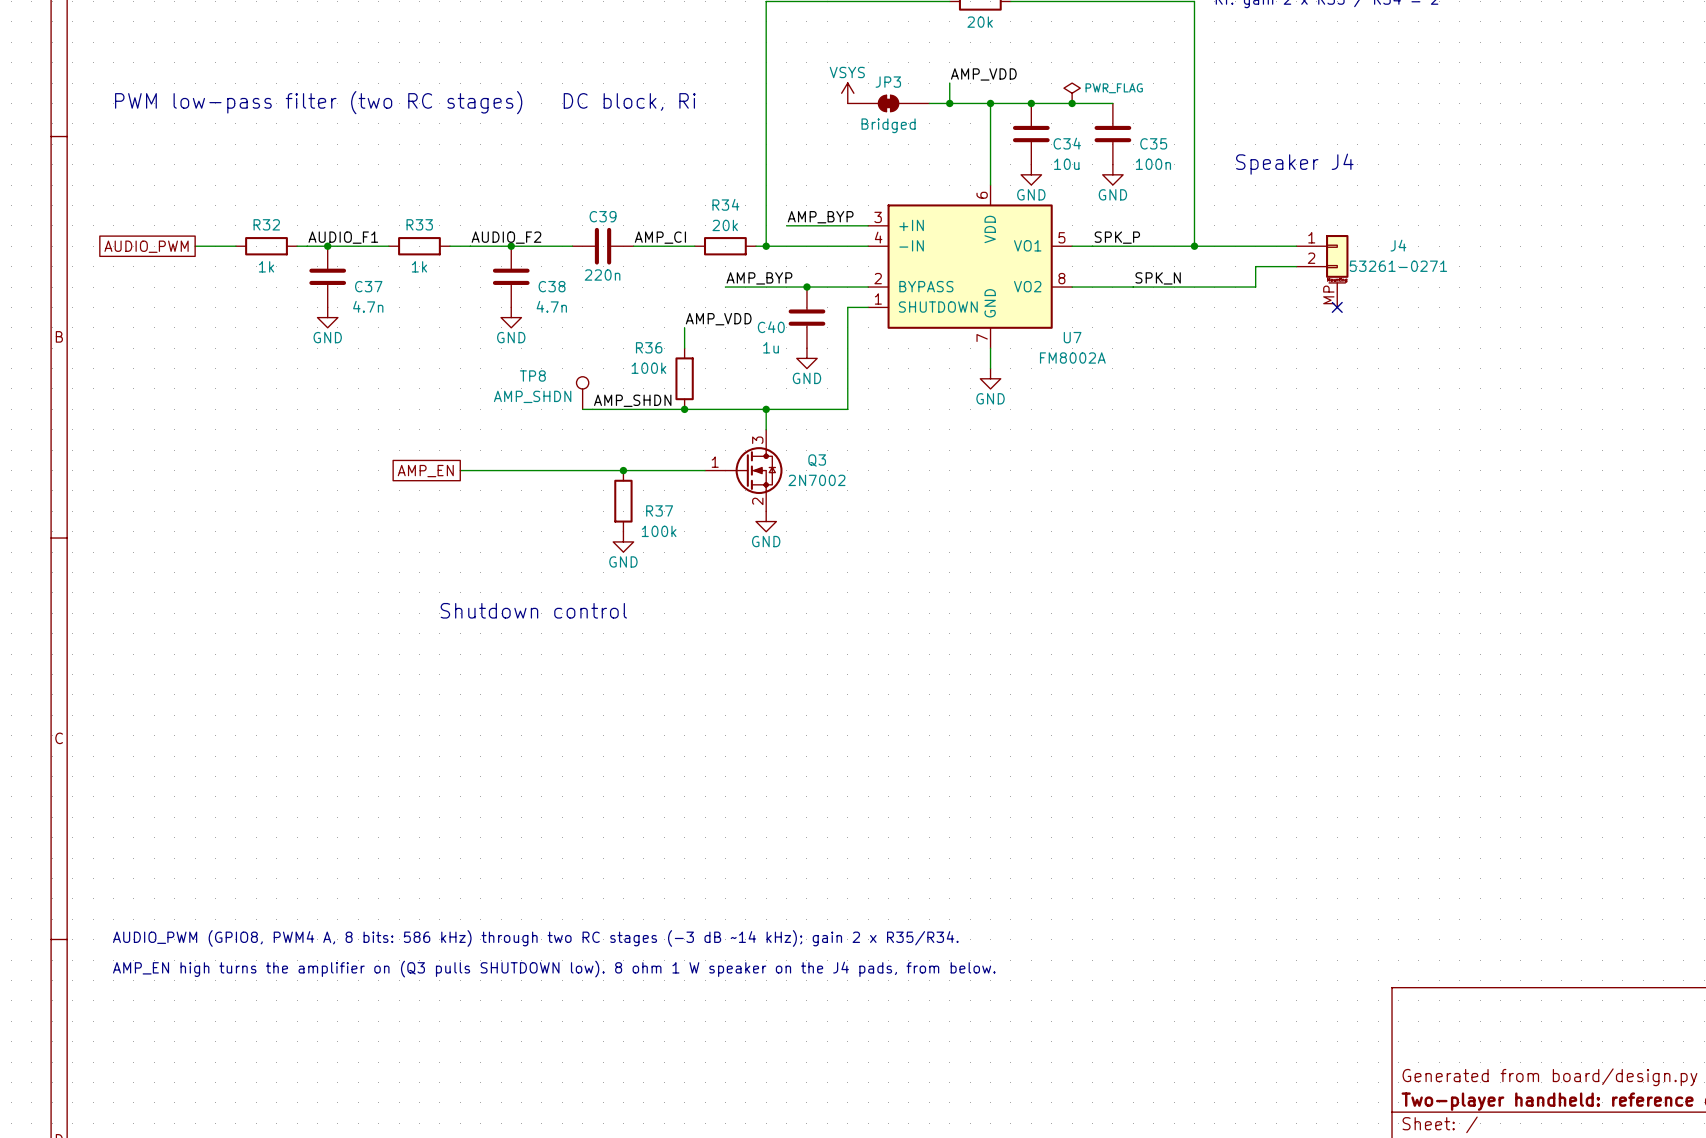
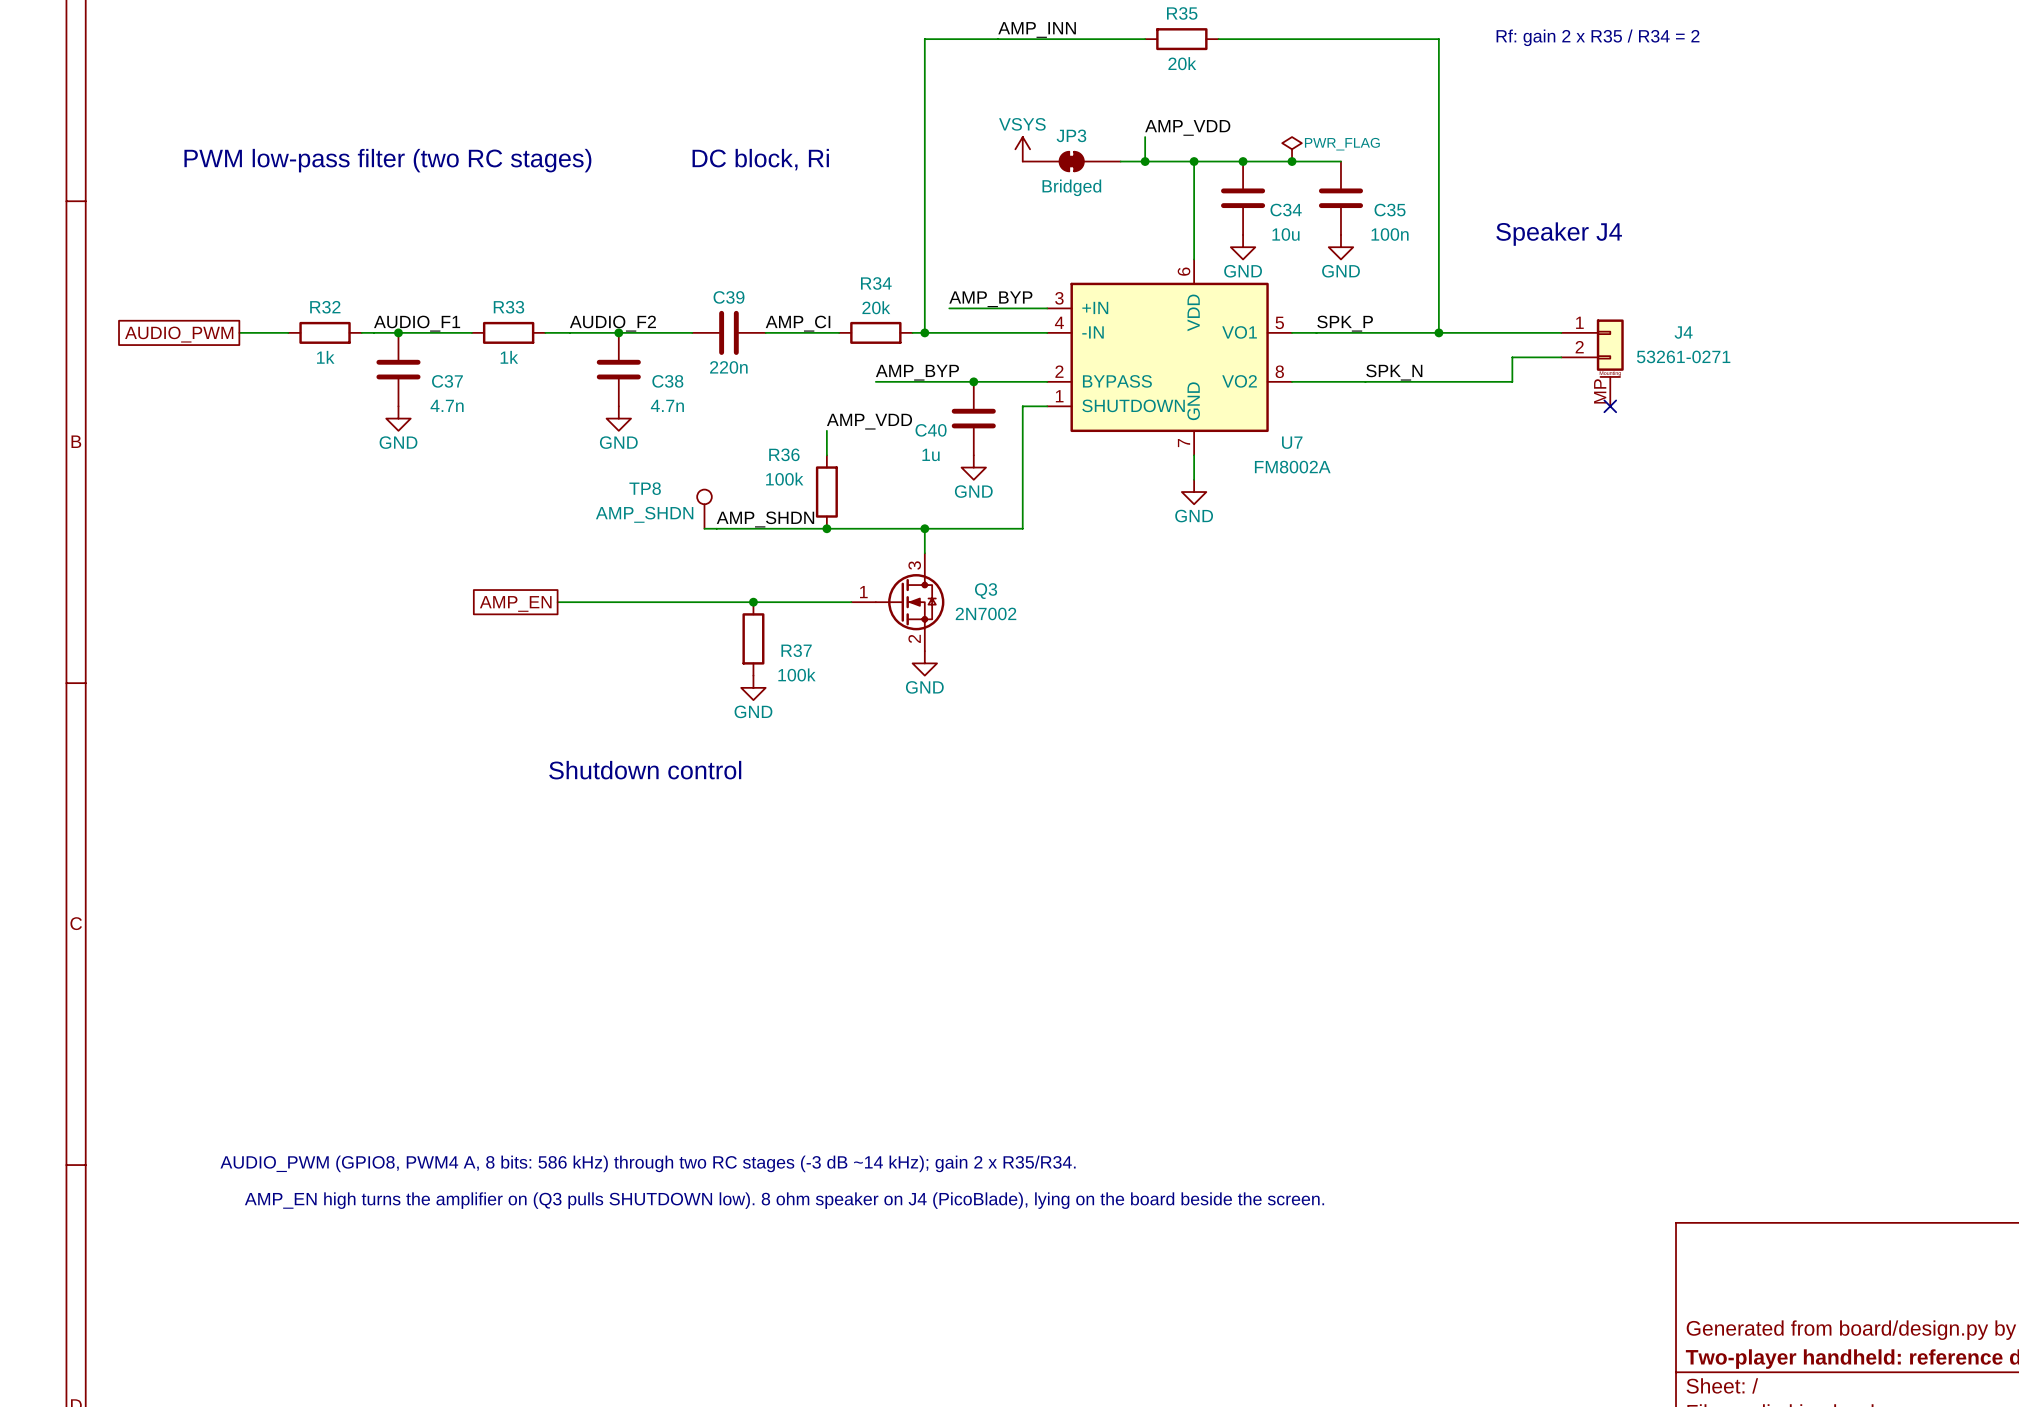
text: AMP_EN high turns the amplifier on (Q3 pulls SHUTDOWN low). 8 ohm 1 W speaker on the J4 pads, from below. (554, 969) -> AMP_EN high turns the amplifier on (Q3 pulls SHUTDOWN low). 8 ohm speaker on J4 (PicoBlade), lying on the board beside the screen. (784, 1200)

